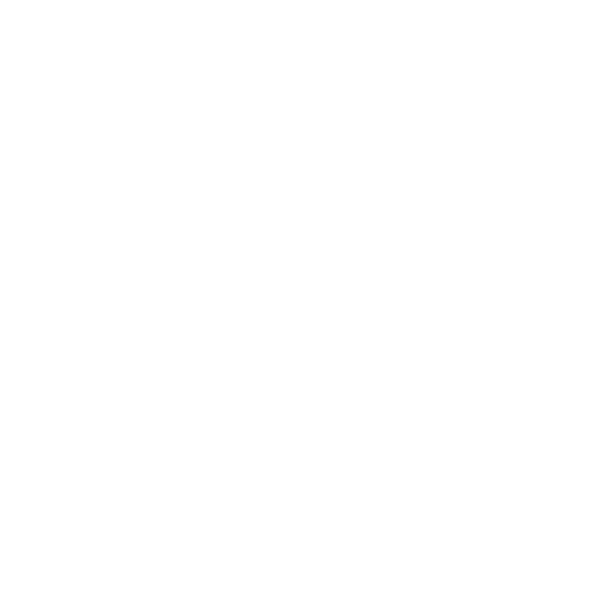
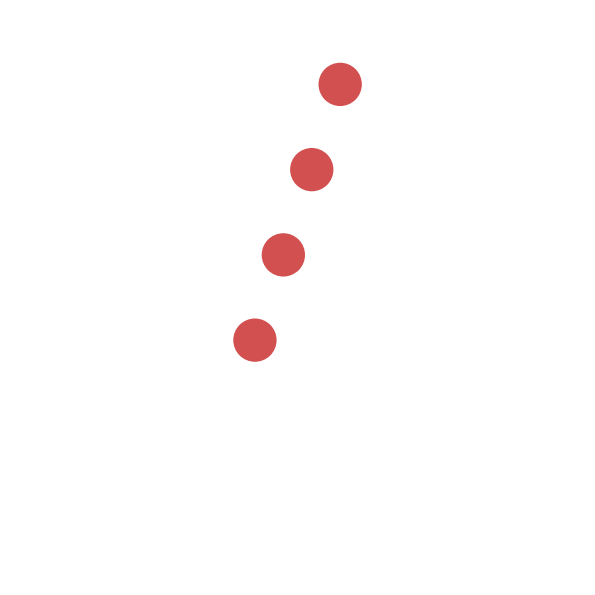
part: none -> (340, 84)
part: none -> (311, 169)
part: none -> (283, 254)
part: none -> (254, 340)

